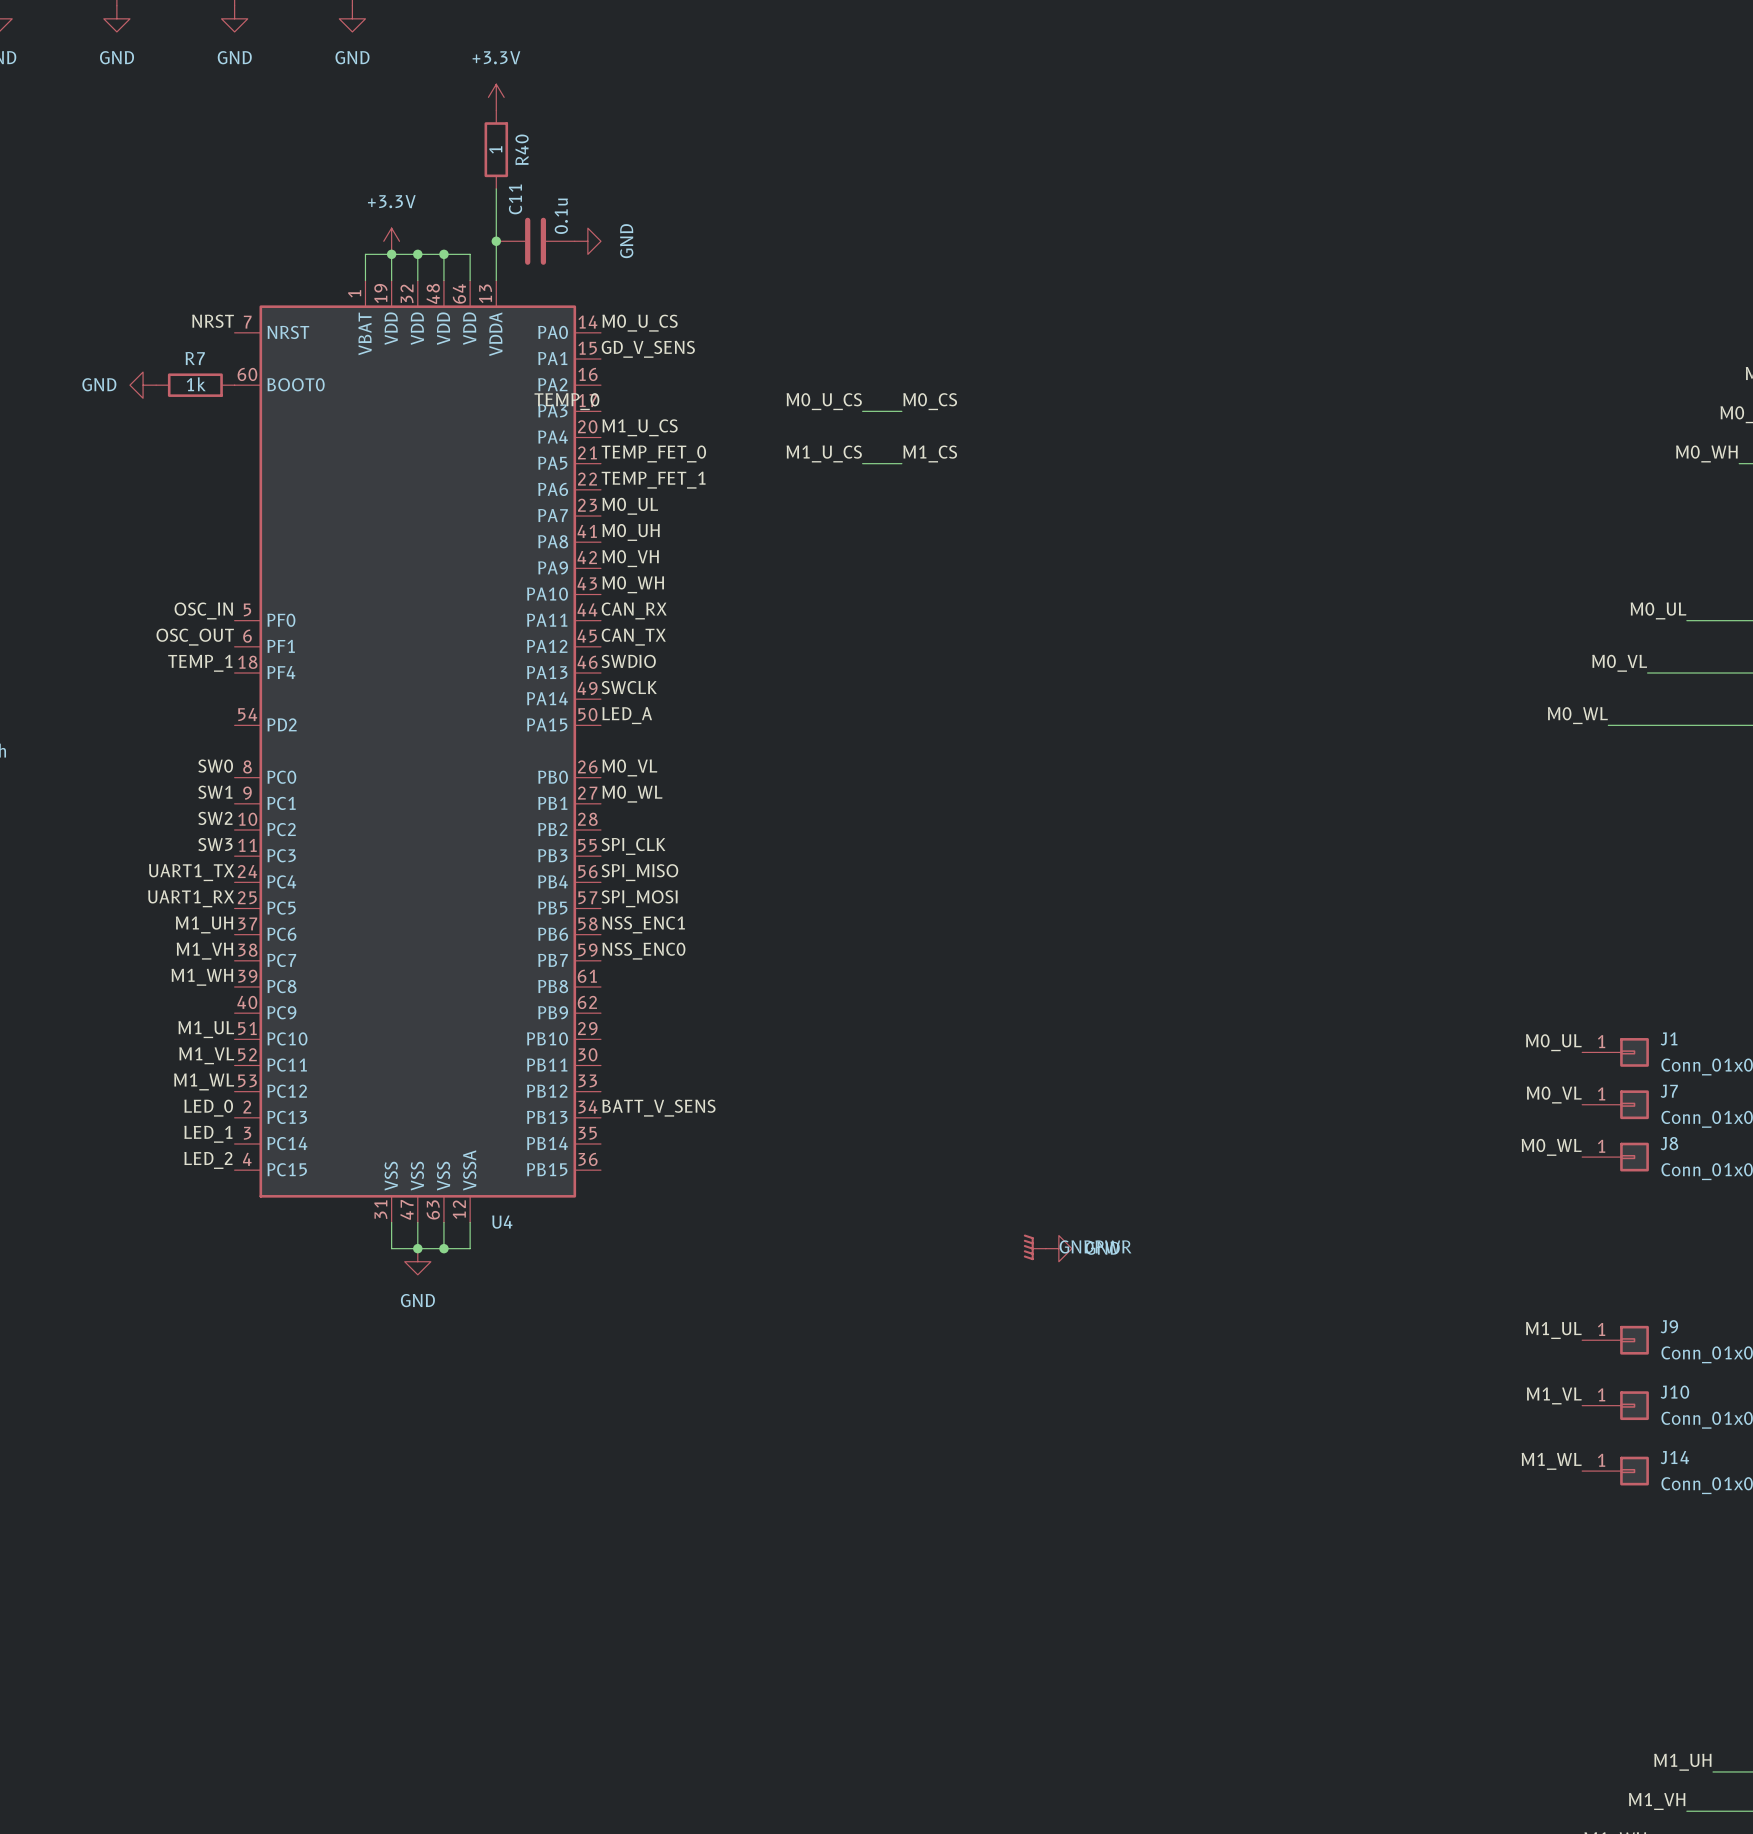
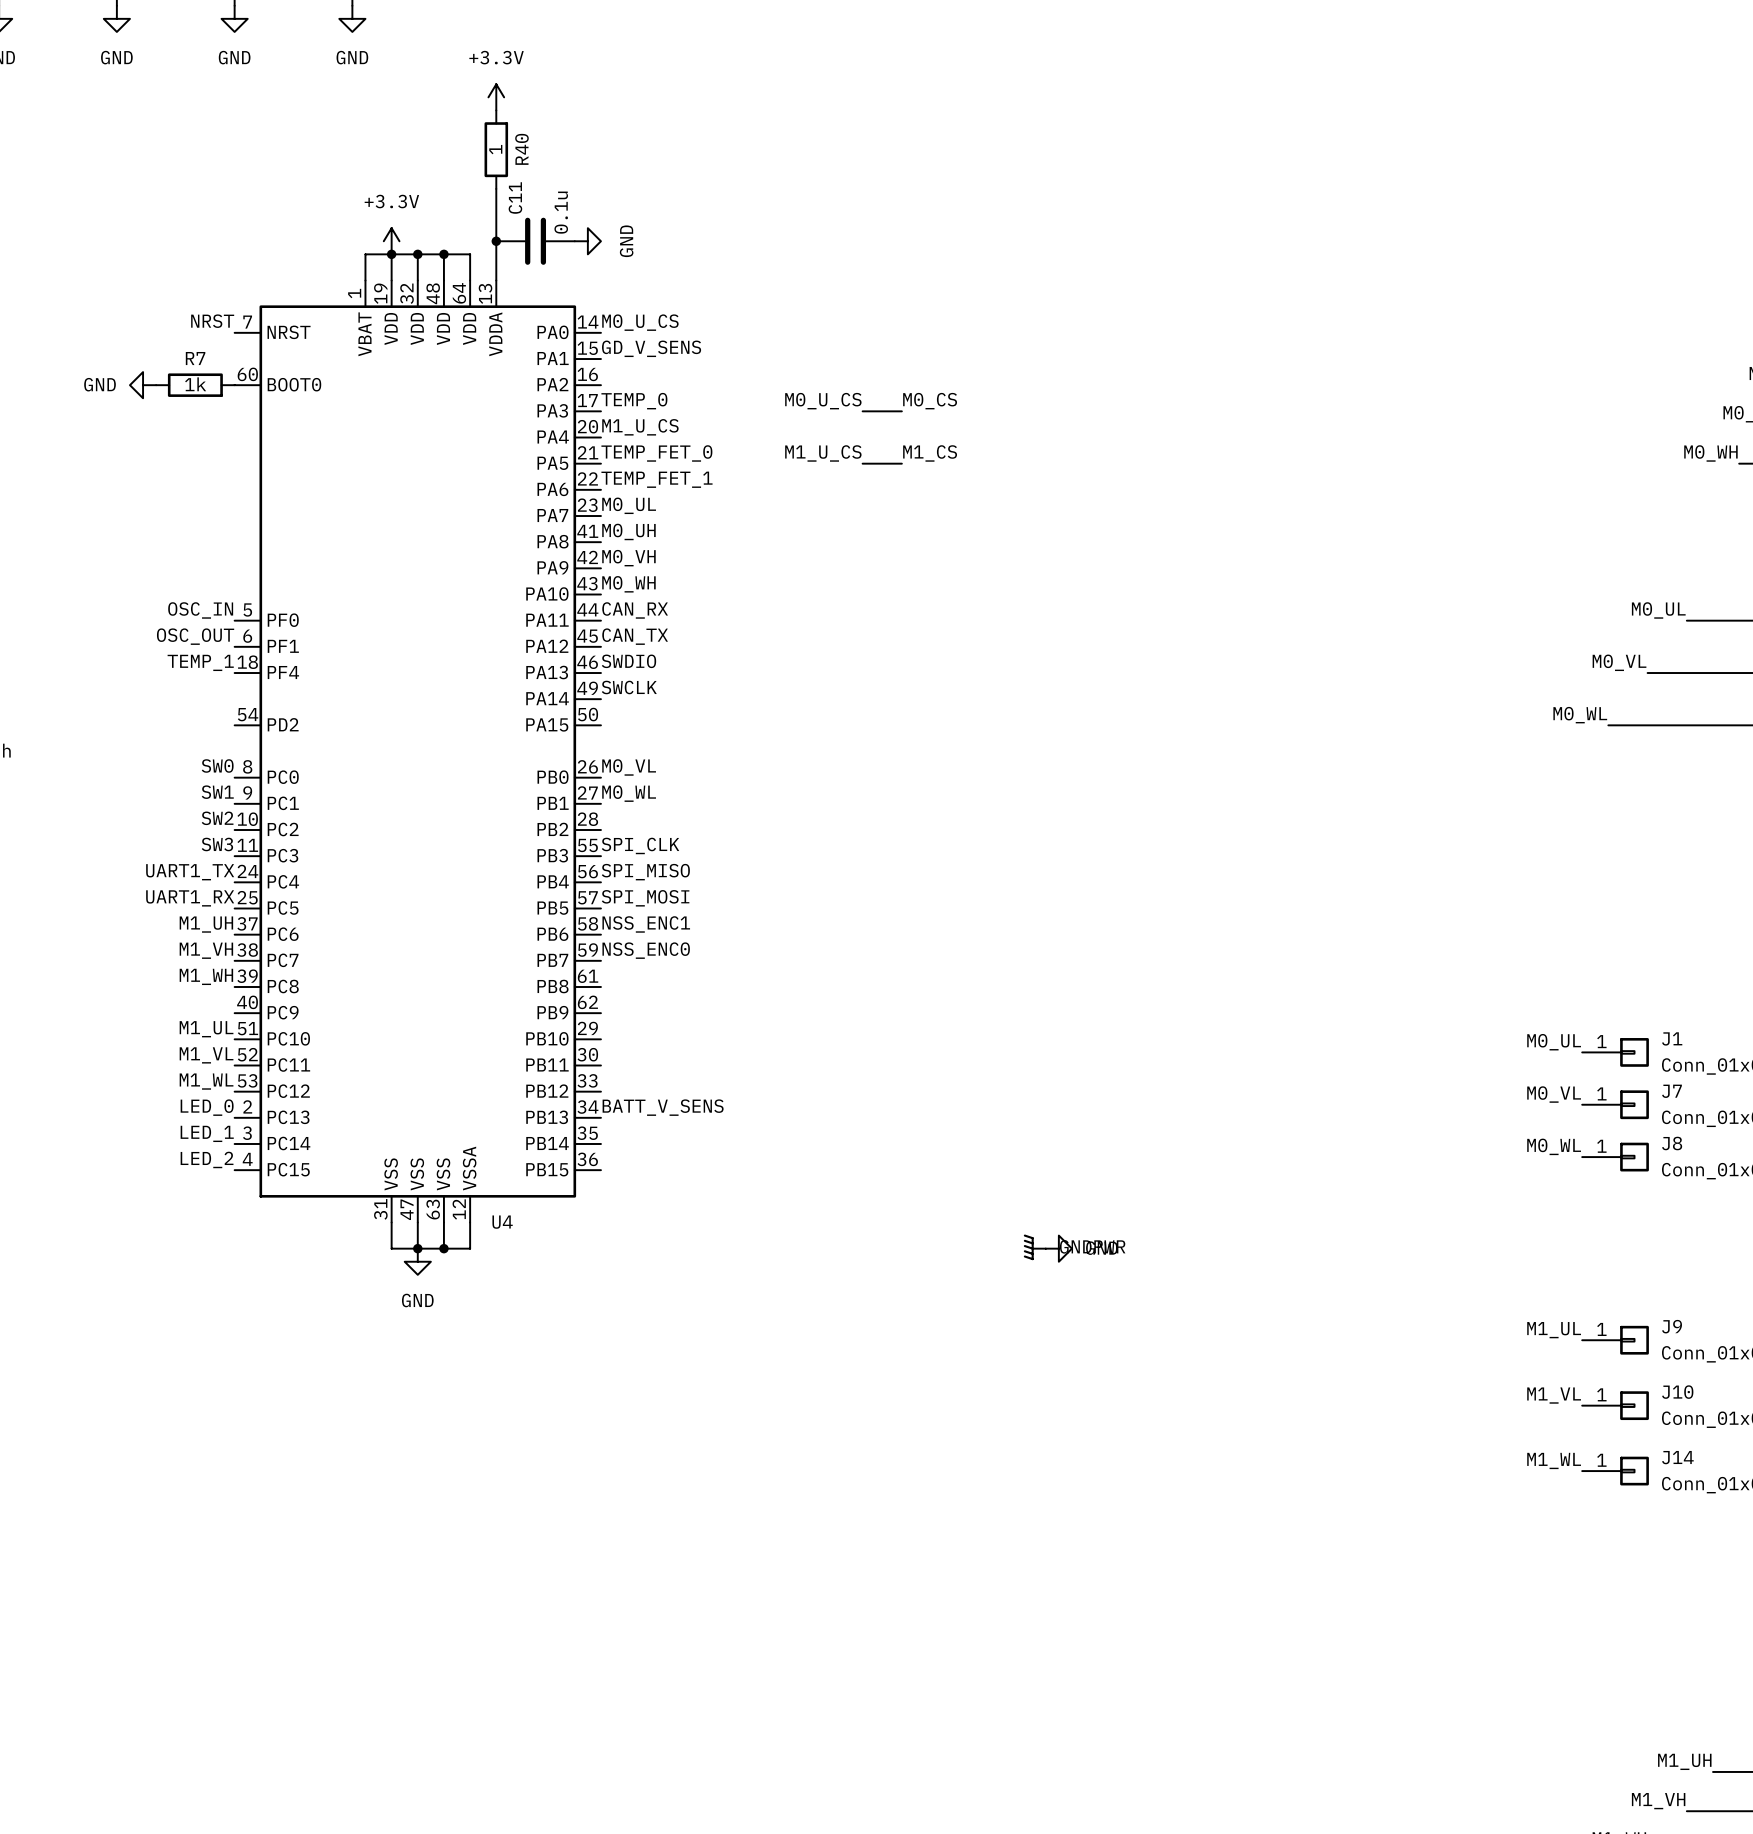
label position: TEMP_0 (566, 401) -> TEMP_0 (634, 401)
label: LED_A (627, 715) -> none

